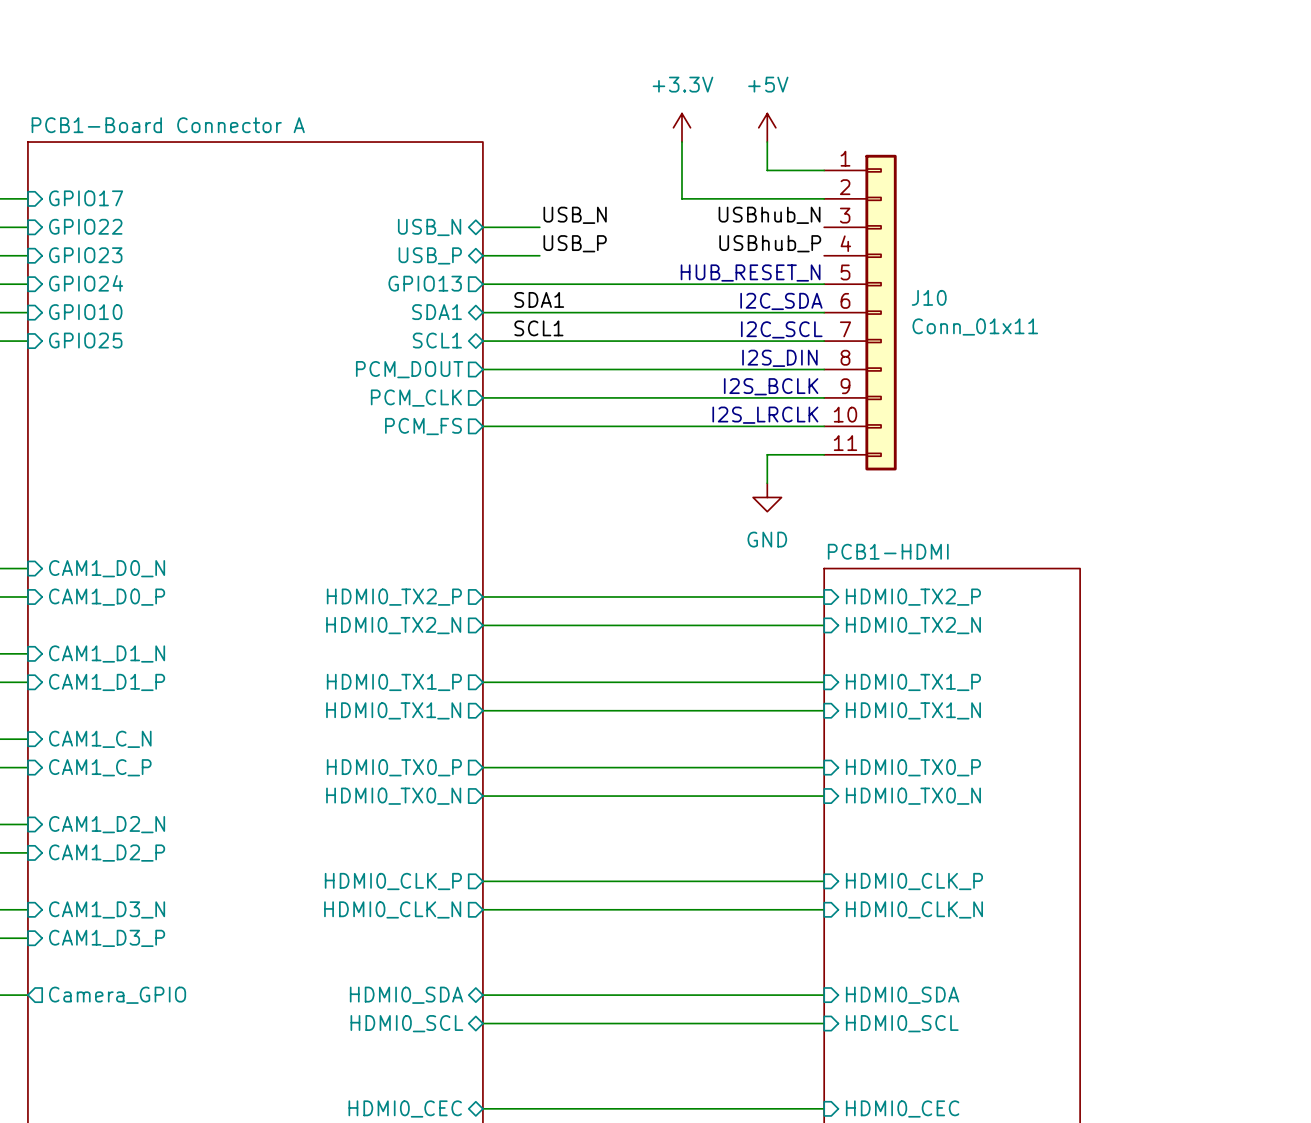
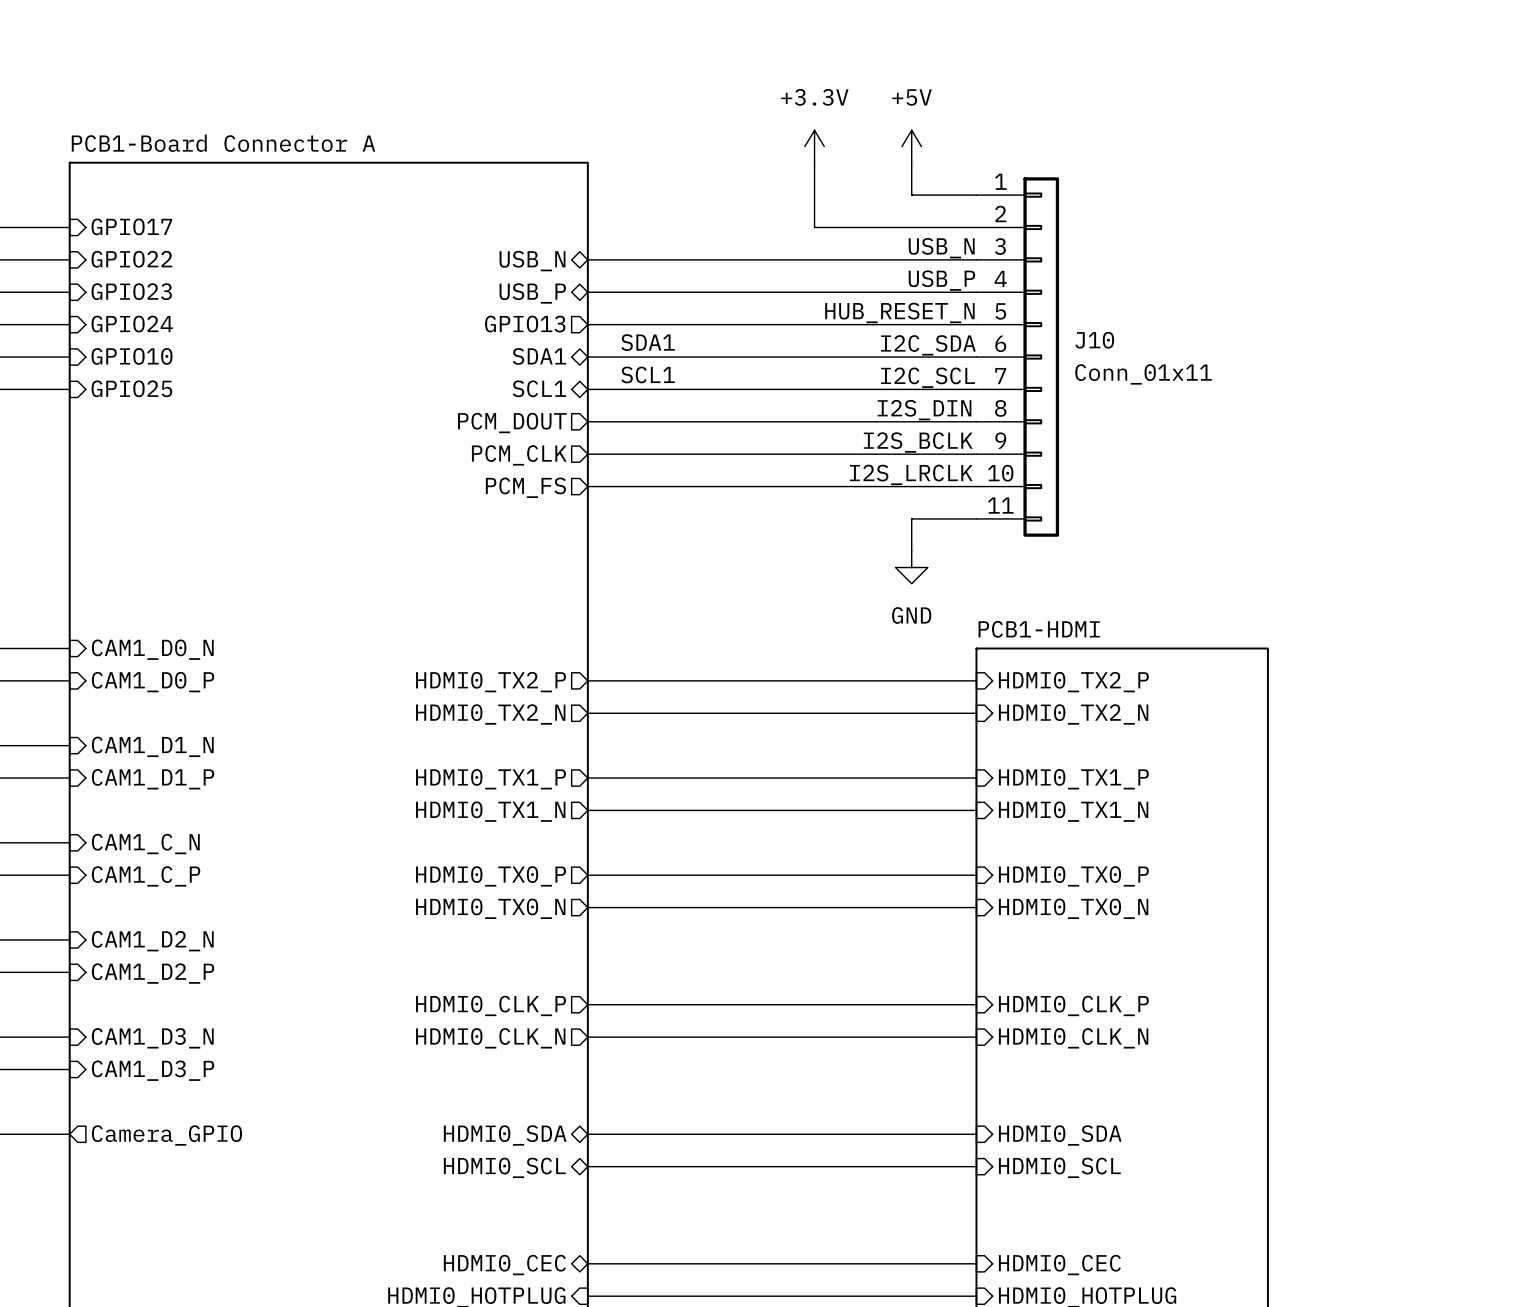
label: USB_N (575, 215) -> none
label: USBhub_N (769, 215) -> none
text: none -> USB_N (941, 248)
wire: none -> (652, 259) (976, 259)
label: USB_P (575, 243) -> none
label: USBhub_P (770, 243) -> none
text: none -> USB_P (941, 280)
wire: none -> (652, 292) (976, 292)

